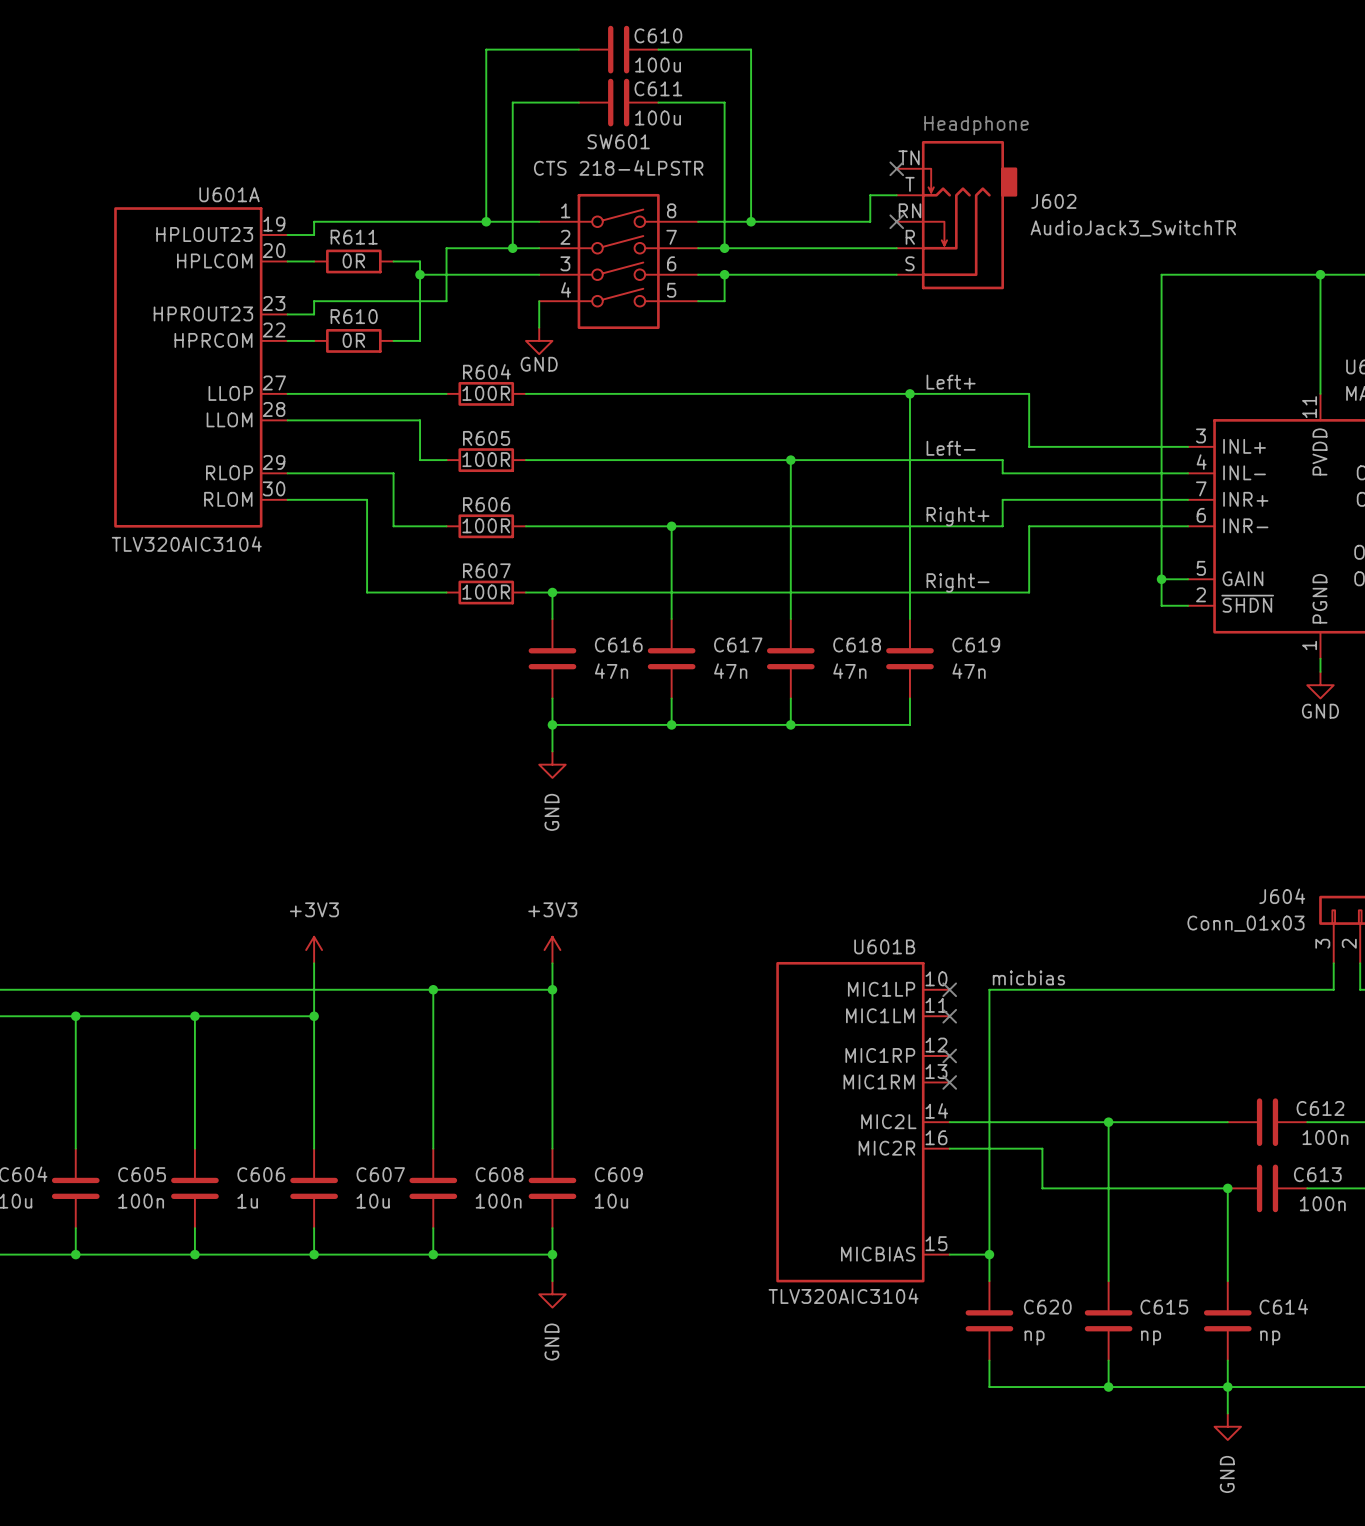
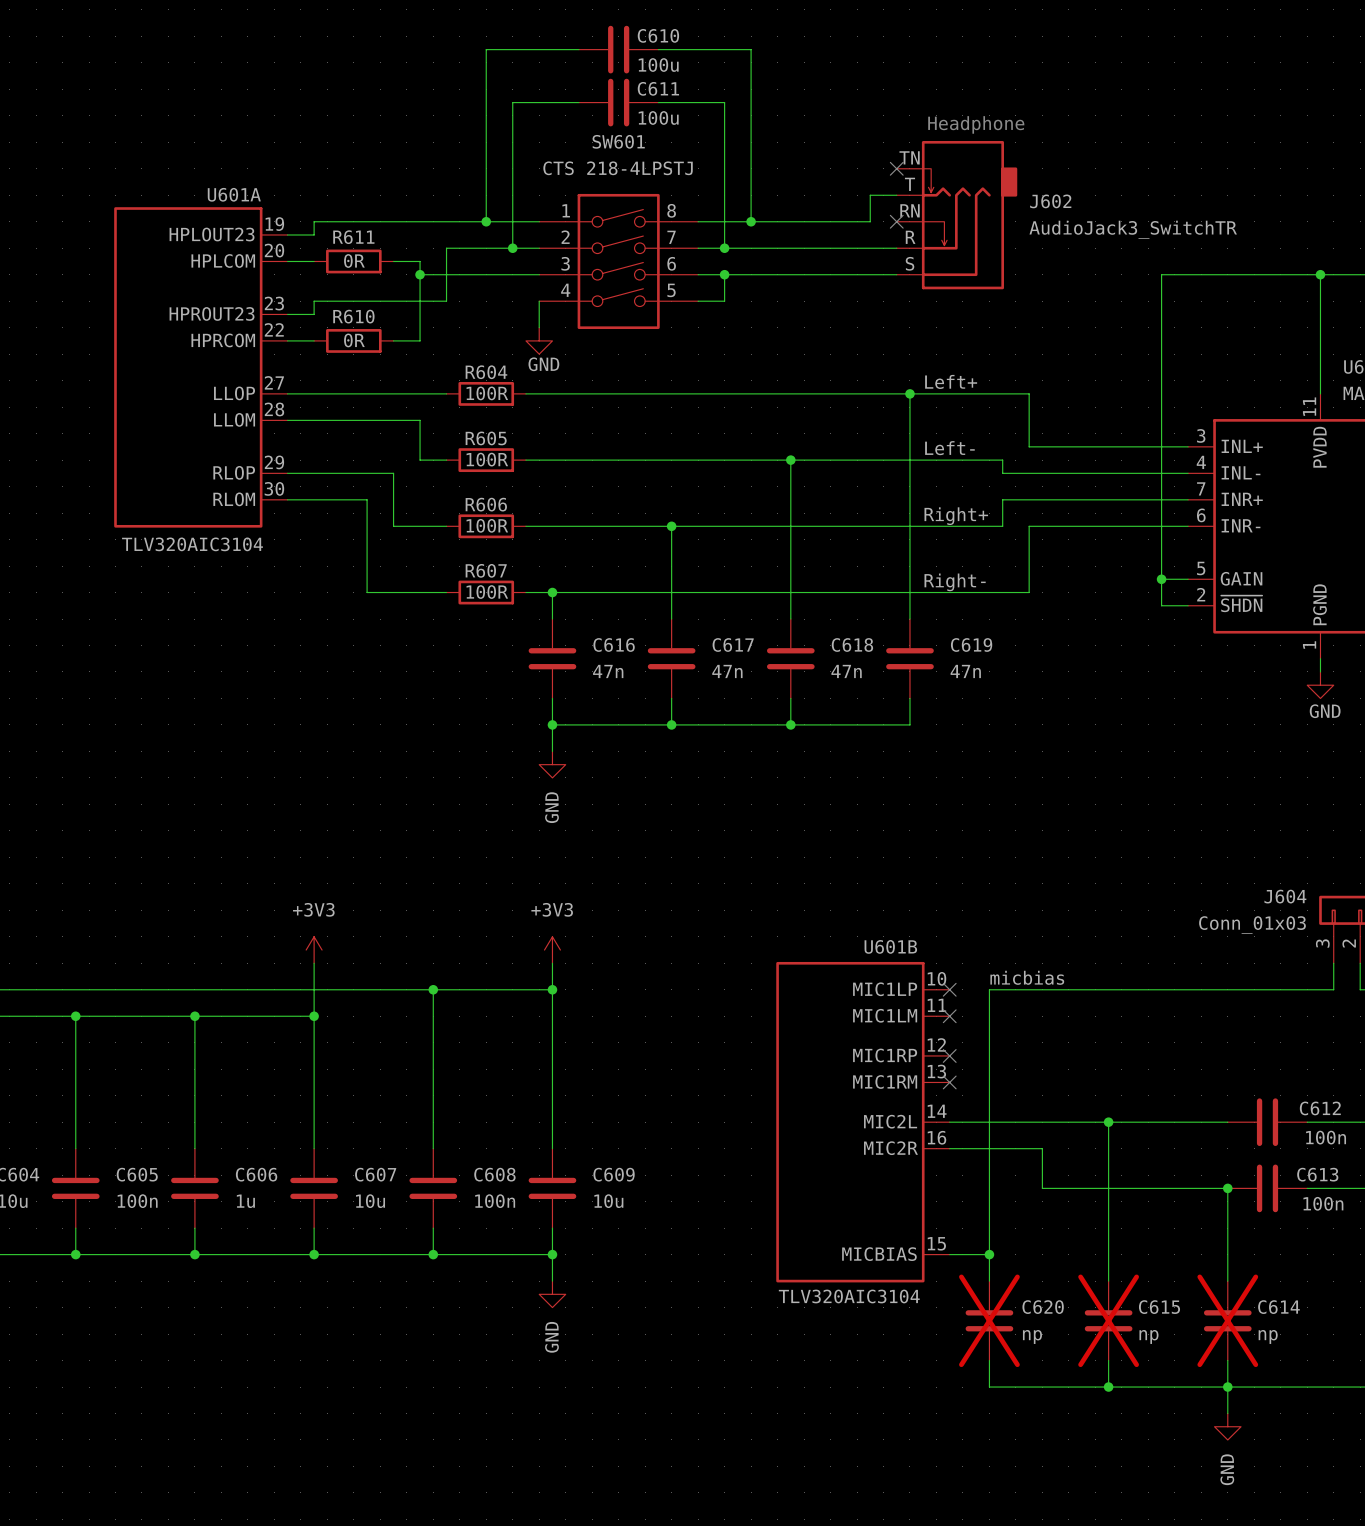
SW601 value: CTS 218-4LPSTR (618, 167) -> CTS 218-4LPSTJ (618, 168)
C620 do-not-place cross: none -> (989, 1320)
C615 do-not-place cross: none -> (1108, 1320)
C614 do-not-place cross: none -> (1227, 1320)

